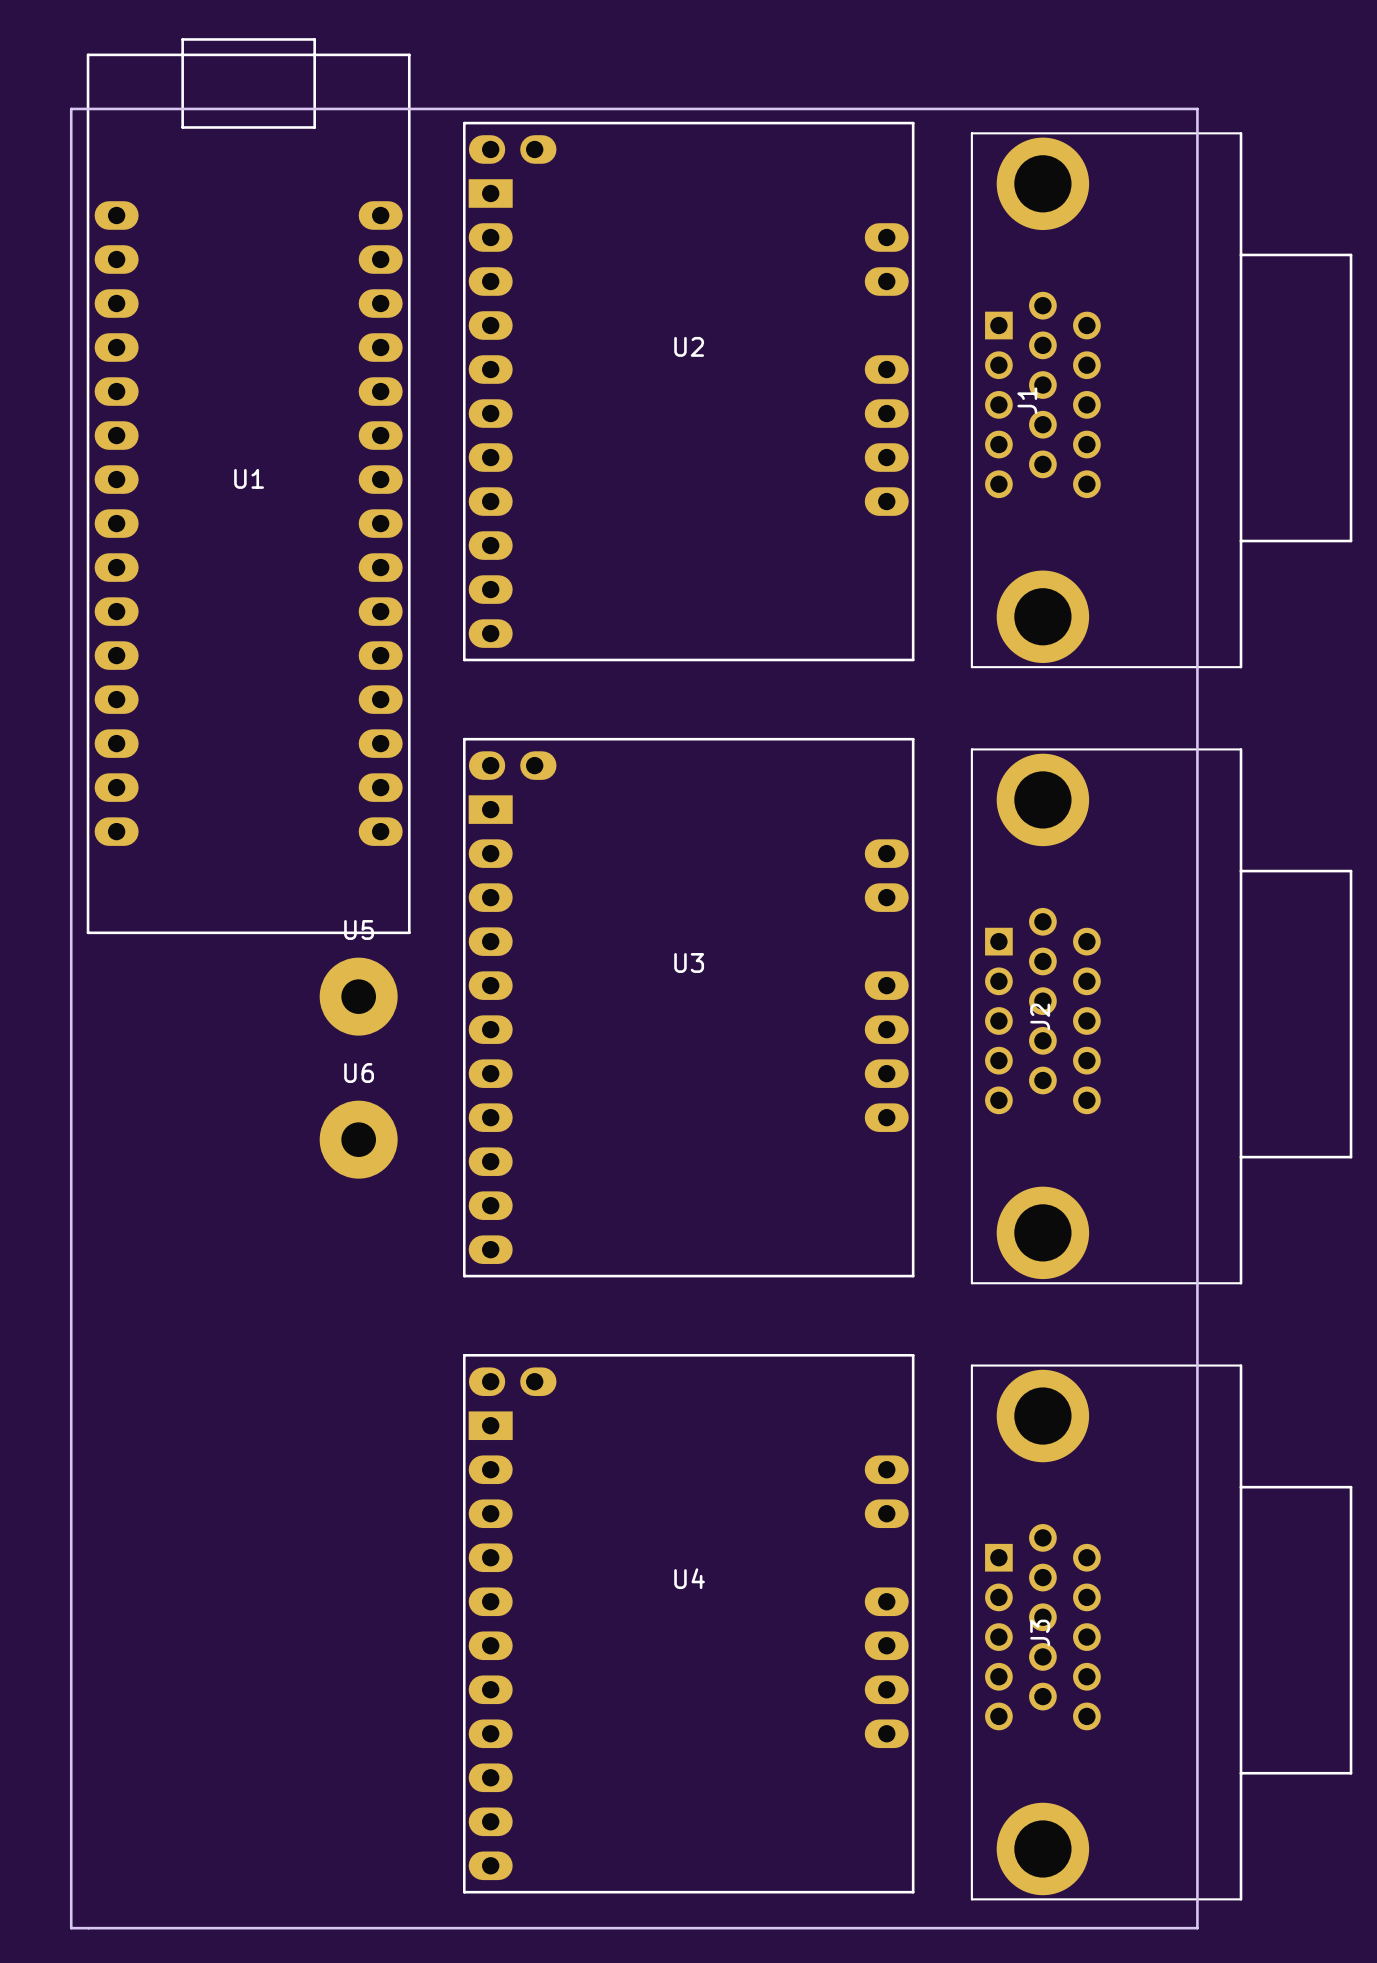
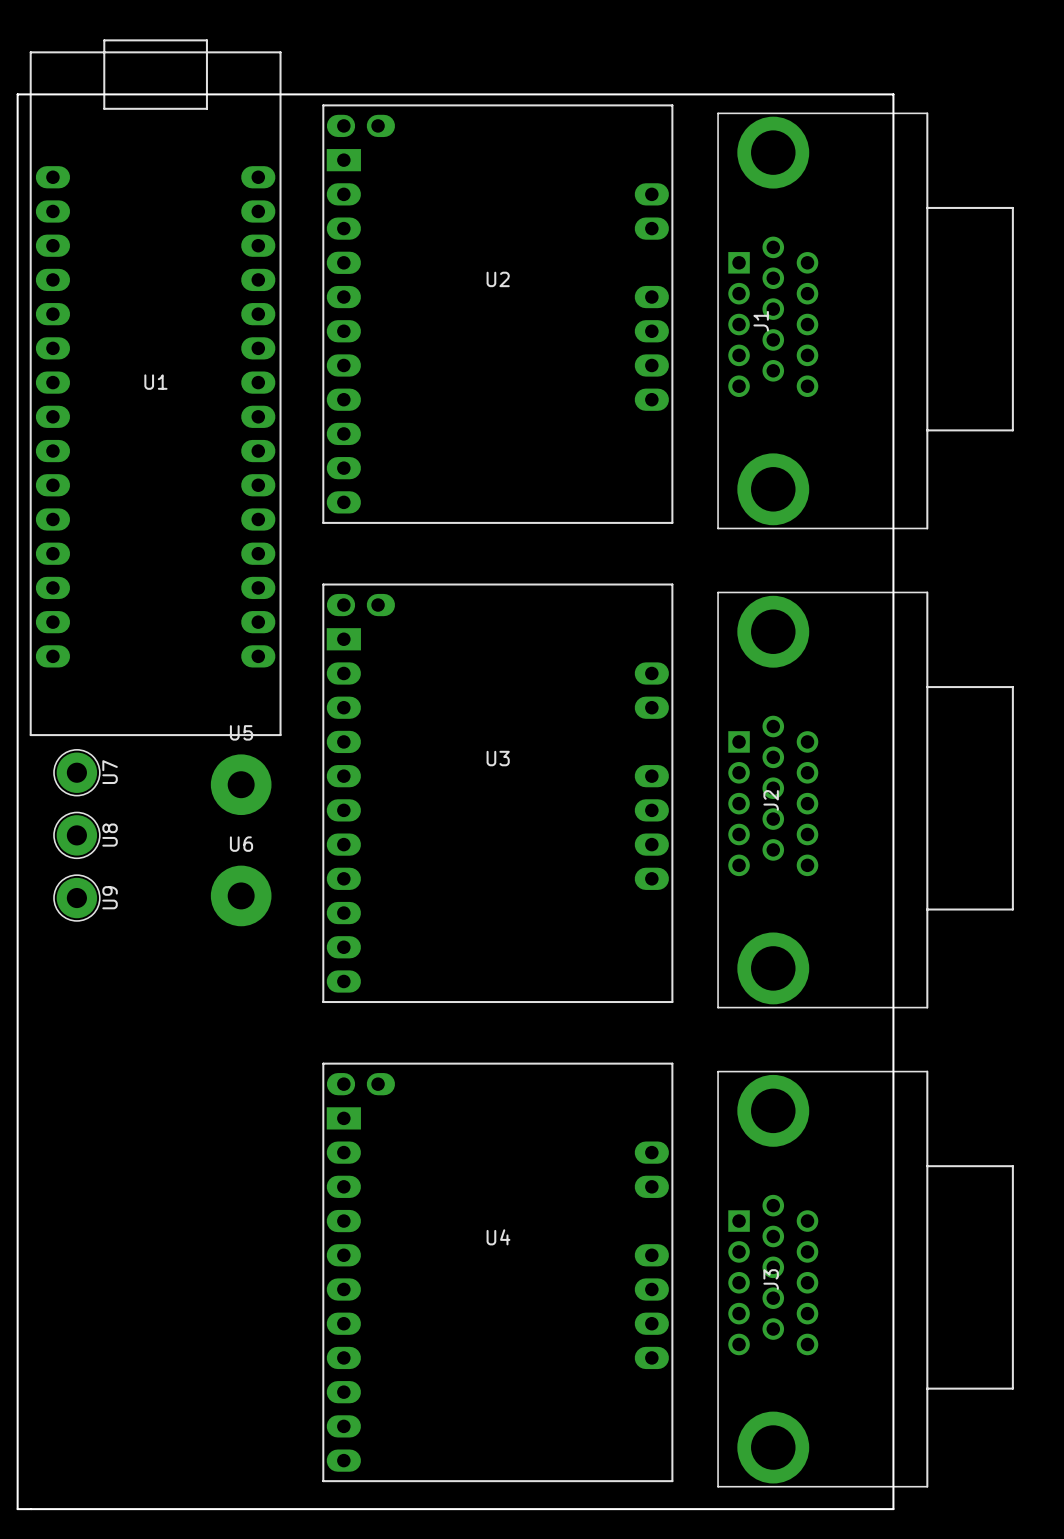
U7: none -> (76, 772)
U8: none -> (76, 835)
U9: none -> (76, 898)

